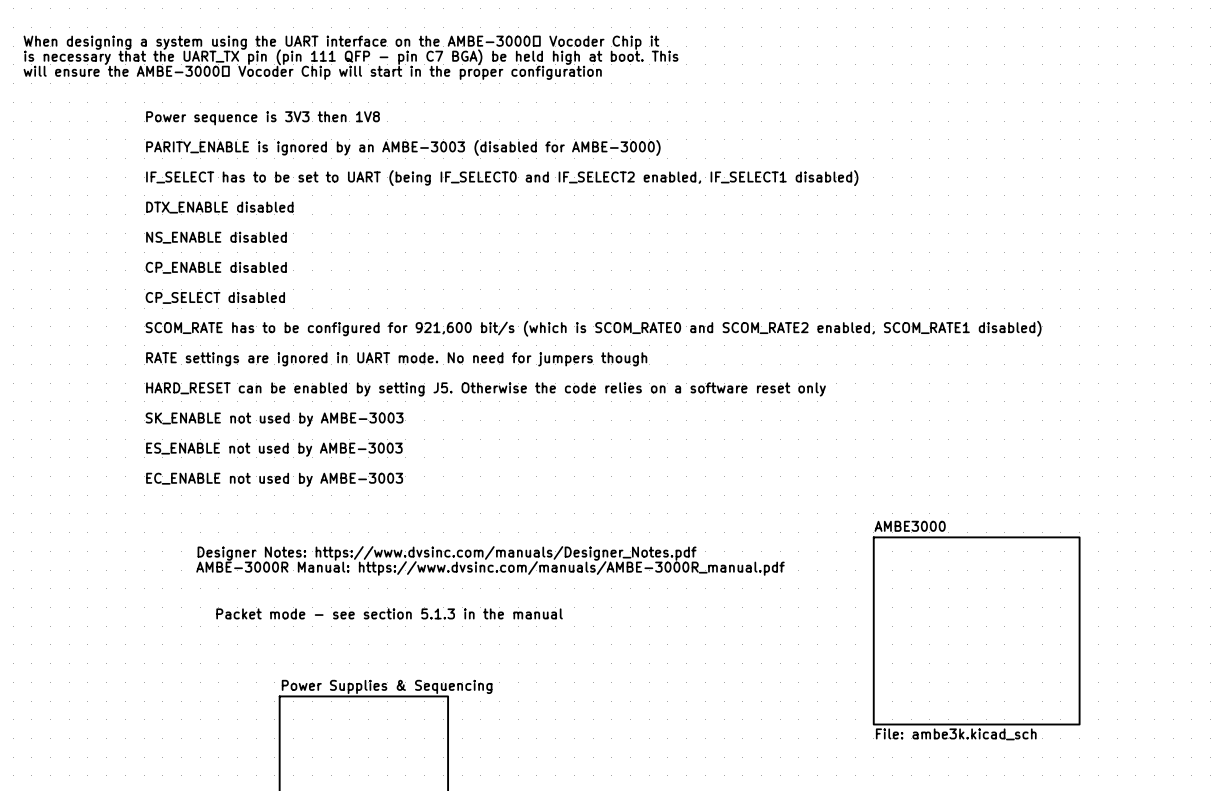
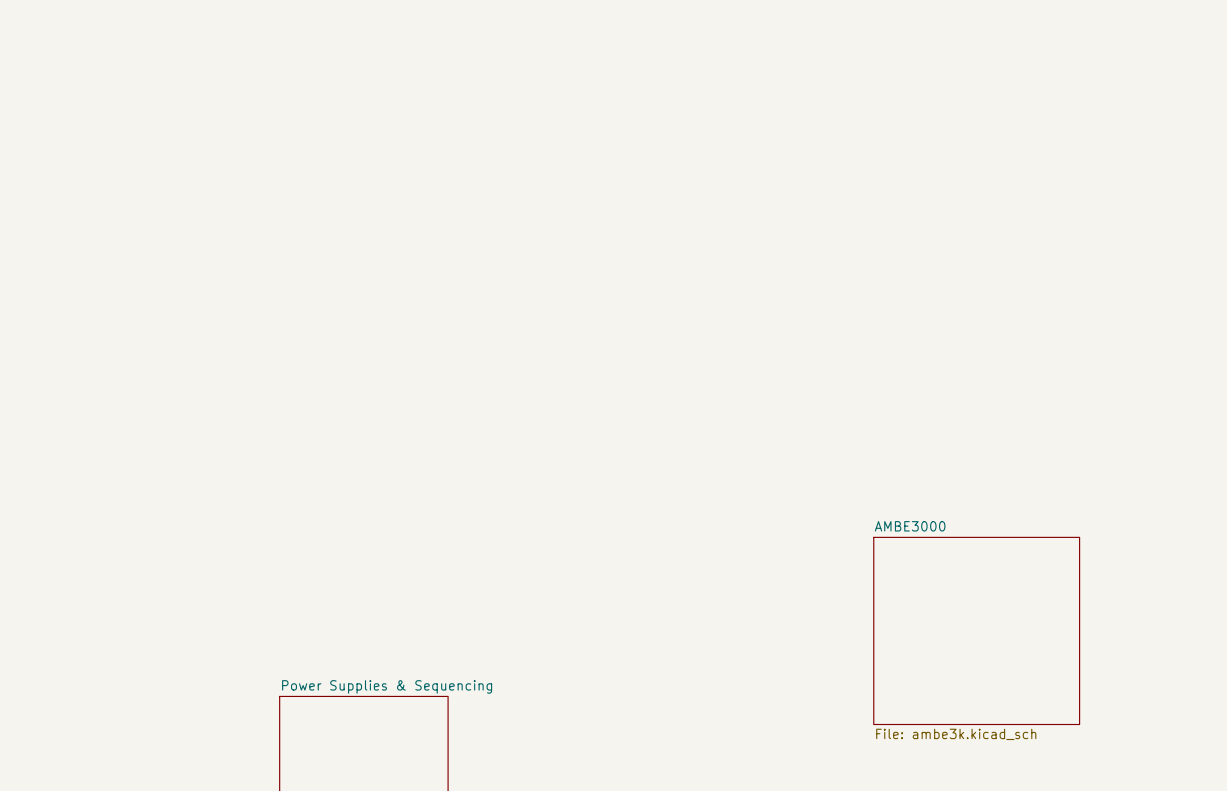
text: When designing a system using the UART interface on the AMBE-3000™ Vocoder Chip it (341, 42) -> none
text: is necessary that the UART_TX pin (pin 111 QFP - pin C7 BGA) be held high at boot. This (351, 57) -> none
text: will ensure the AMBE-3000™ Vocoder Chip will start in the proper configuration (312, 72) -> none
text: Power sequence is 3V3 then 1V8 (263, 118) -> none
text: PARITY_ENABLE is ignored by an AMBE-3003 (disabled for AMBE-3000) (403, 147) -> none
text: IF_SELECT has to be set to UART (being IF_SELECT0 and IF_SELECT2 enabled, IF_SELECT1 disabled) (502, 178) -> none
text: DTX_ENABLE disabled (219, 207) -> none
text: NS_ENABLE disabled (216, 237) -> none
text: CP_ENABLE disabled (216, 267) -> none
text: CP_SELECT disabled (215, 297) -> none
text: SCOM_RATE has to be configured for 921,600 bit/s (which is SCOM_RATE0 and SCOM_RATE2 enabled, SCOM_RATE1 disabled) (593, 328) -> none
text: RATE settings are ignored in UART mode. No need for jumpers though (396, 359) -> none
text: HARD_RESET can be enabled by setting J5. Otherwise the code relies on a software reset only (486, 389) -> none
text: SK_ENABLE not used by AMBE-3003 (274, 419) -> none
text: ES_ENABLE not used by AMBE-3003 (274, 449) -> none
text: EC_ENABLE not used by AMBE-3003 (274, 479) -> none
text: Designer Notes: https://www.dvsinc.com/manuals/Designer_Notes.pdf (447, 553) -> none
text: AMBE-3000R Manual: https://www.dvsinc.com/manuals/AMBE-3000R_manual.pdf (490, 568) -> none
text: Packet mode - see section 5.1.3 in the manual (389, 613) -> none

